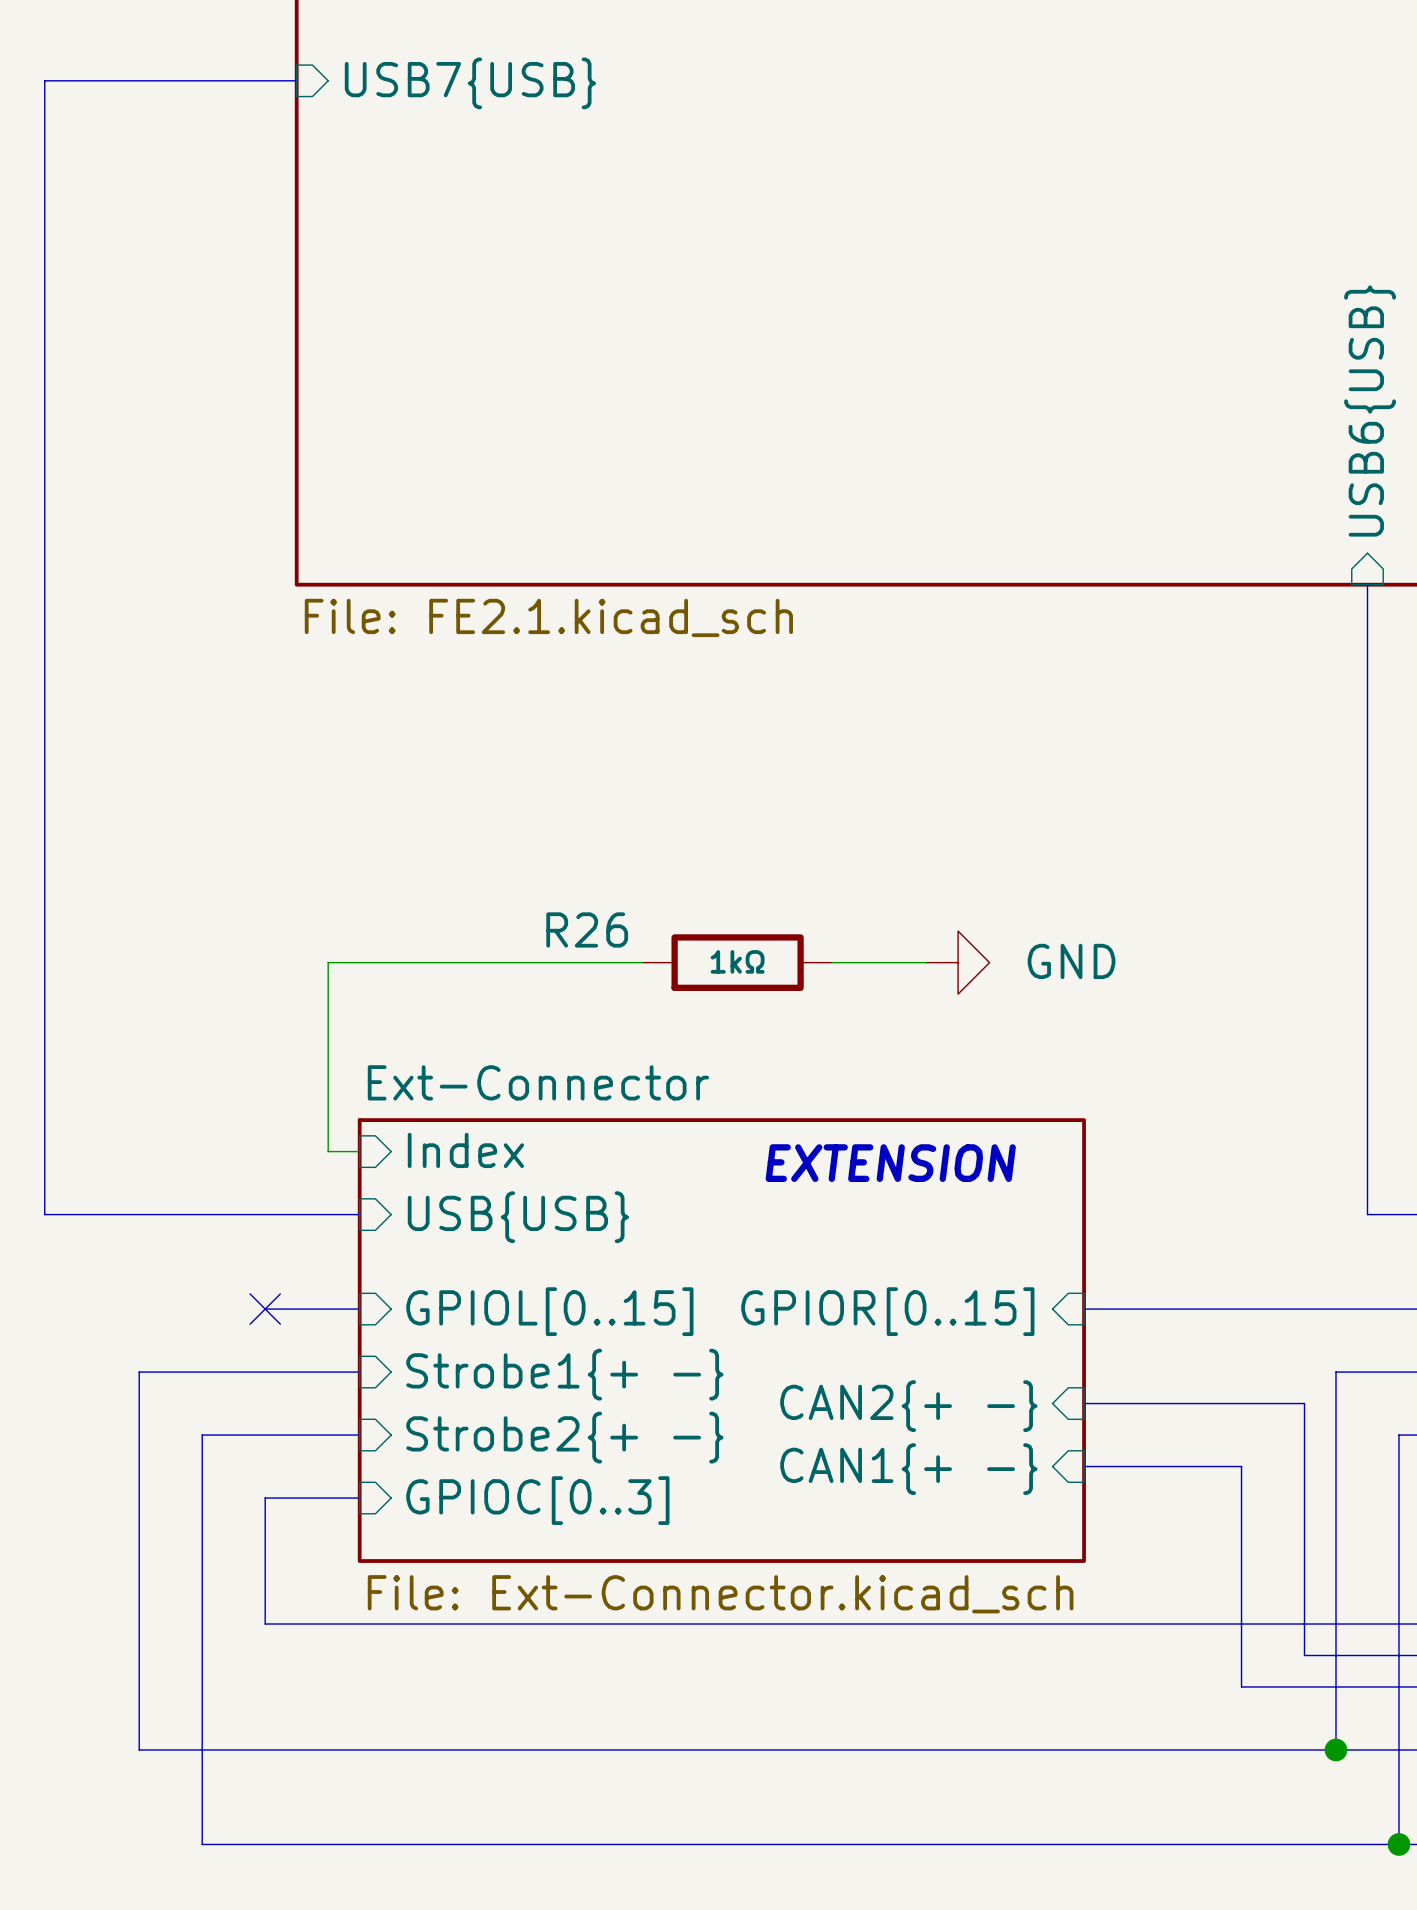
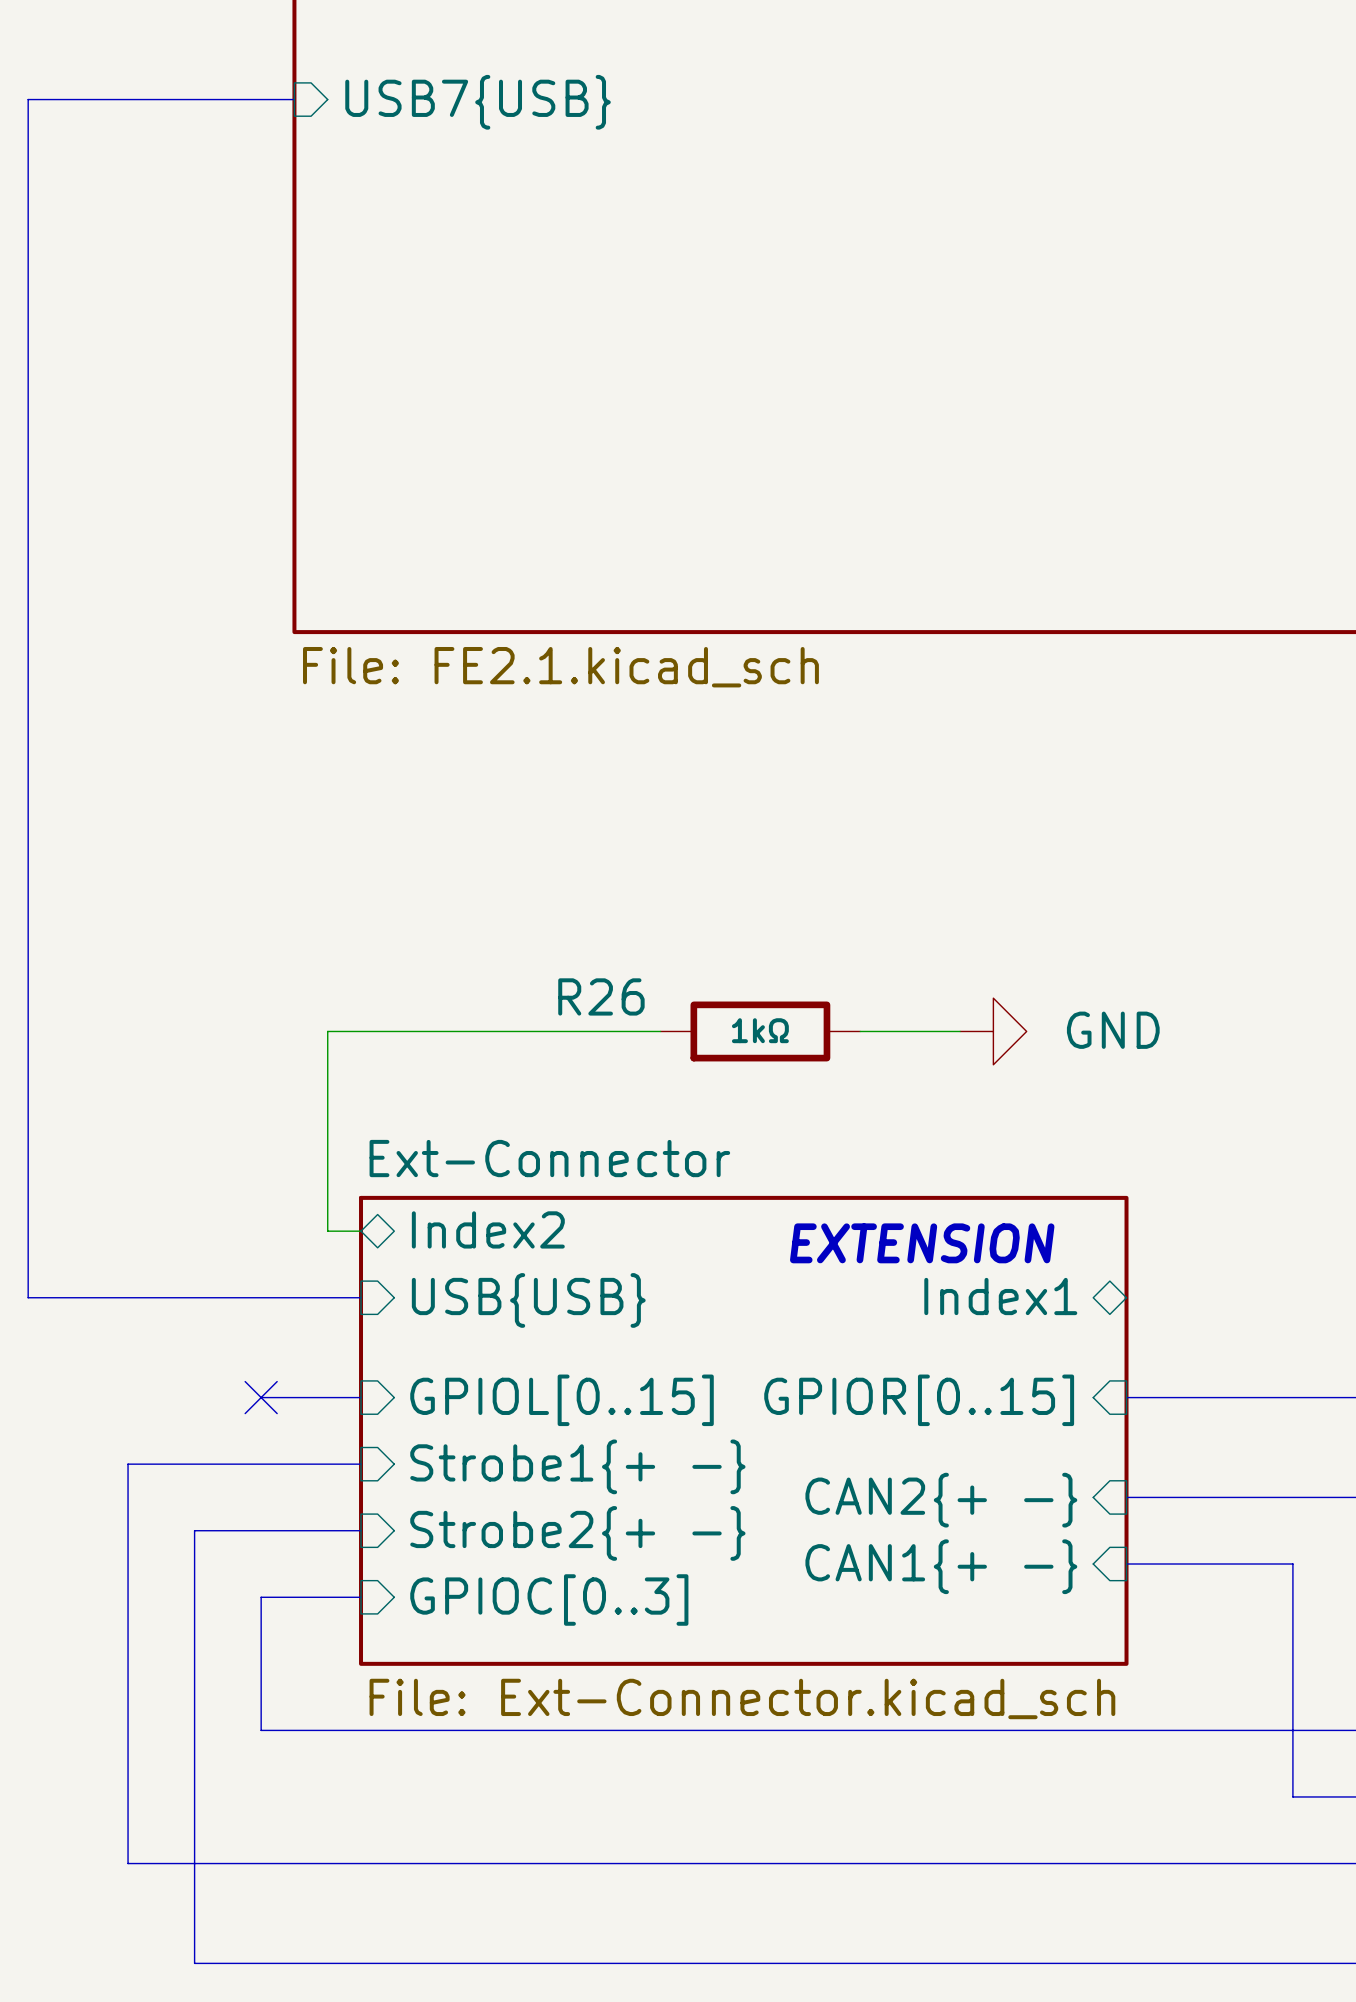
sheet pin shape: input (465, 1150) -> bidirectional (488, 1229)
sheet pin: Index (465, 1150) -> Index2 (488, 1229)
sheet pin: none -> Index1 (1000, 1296)

